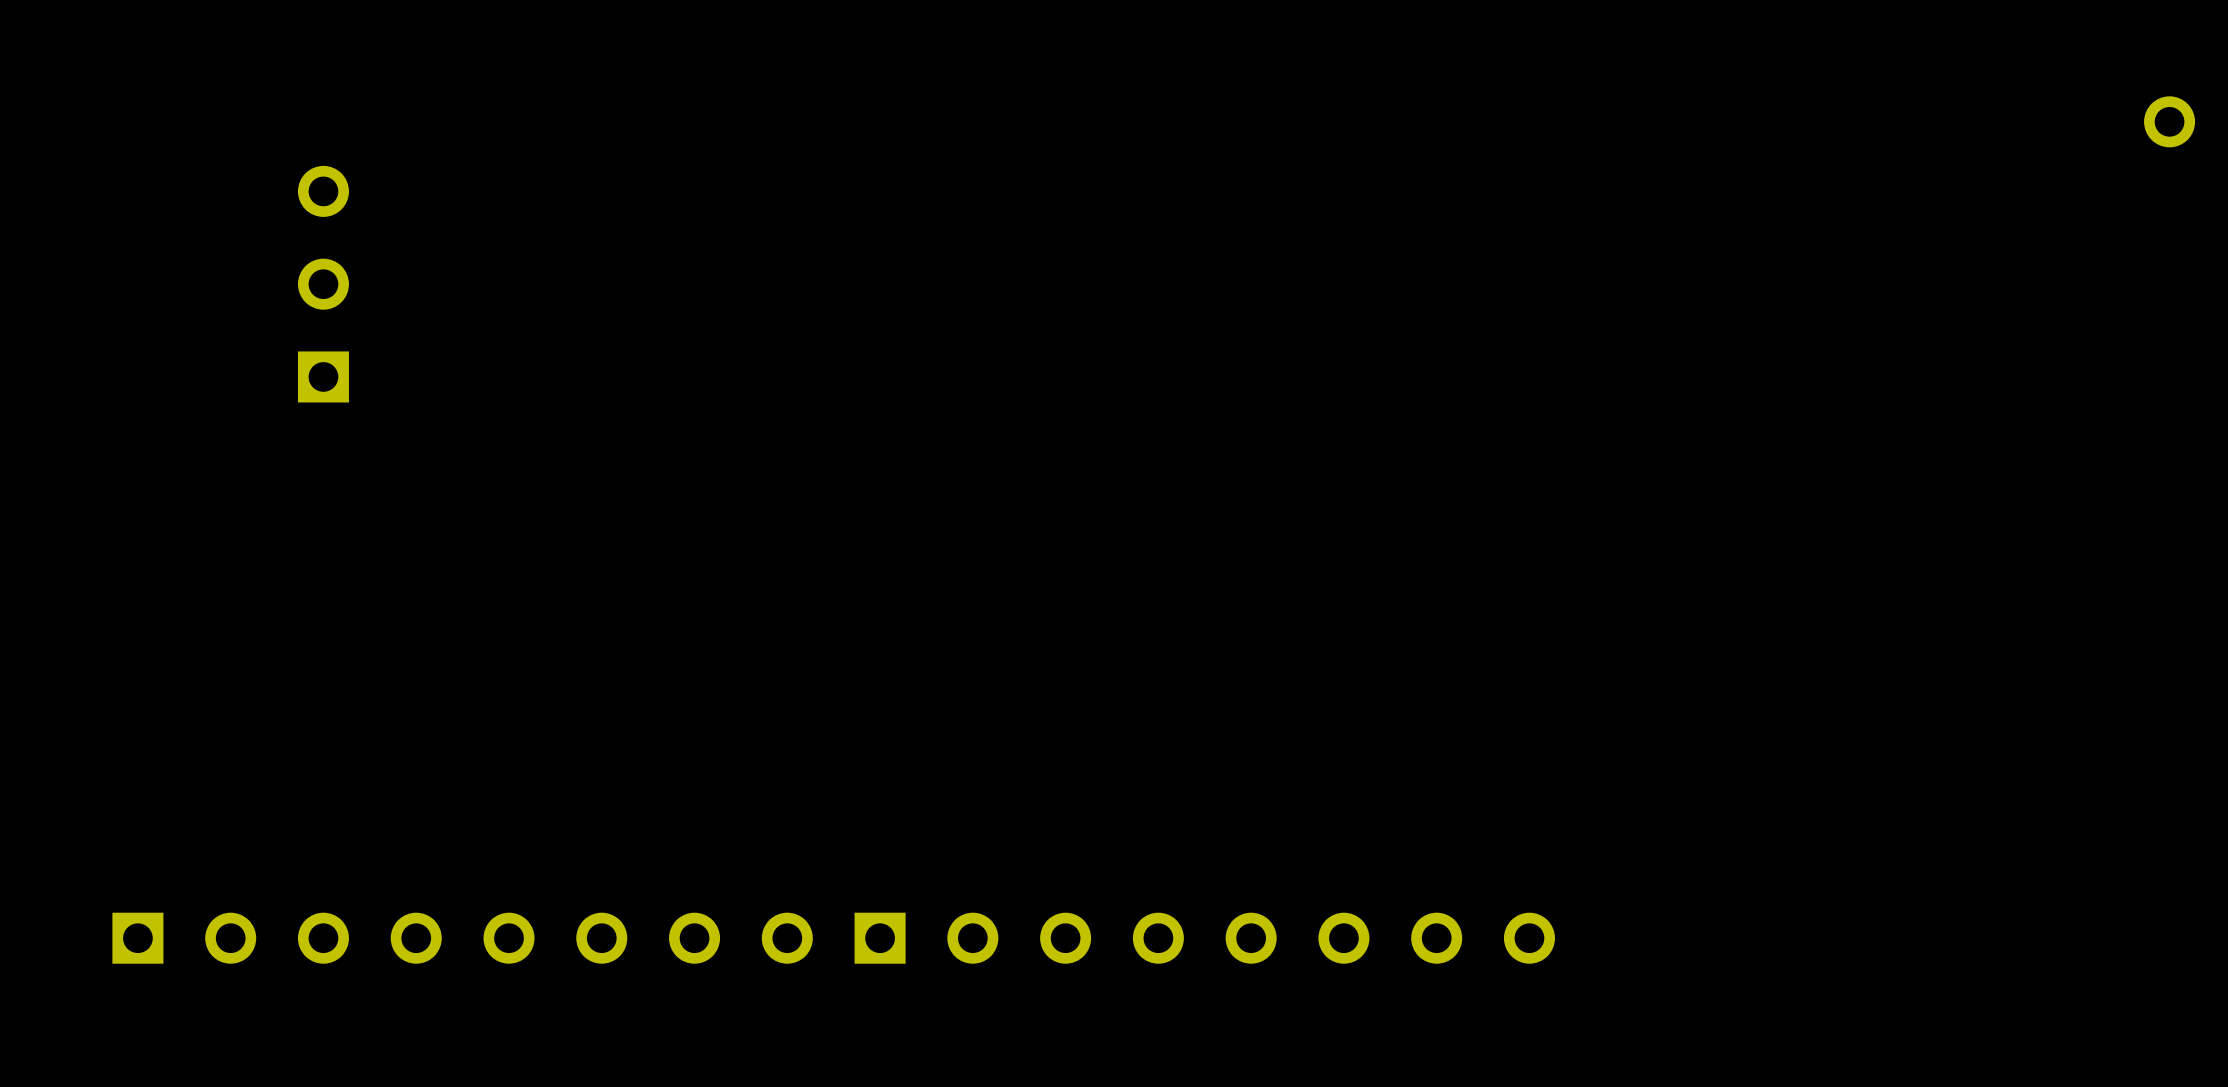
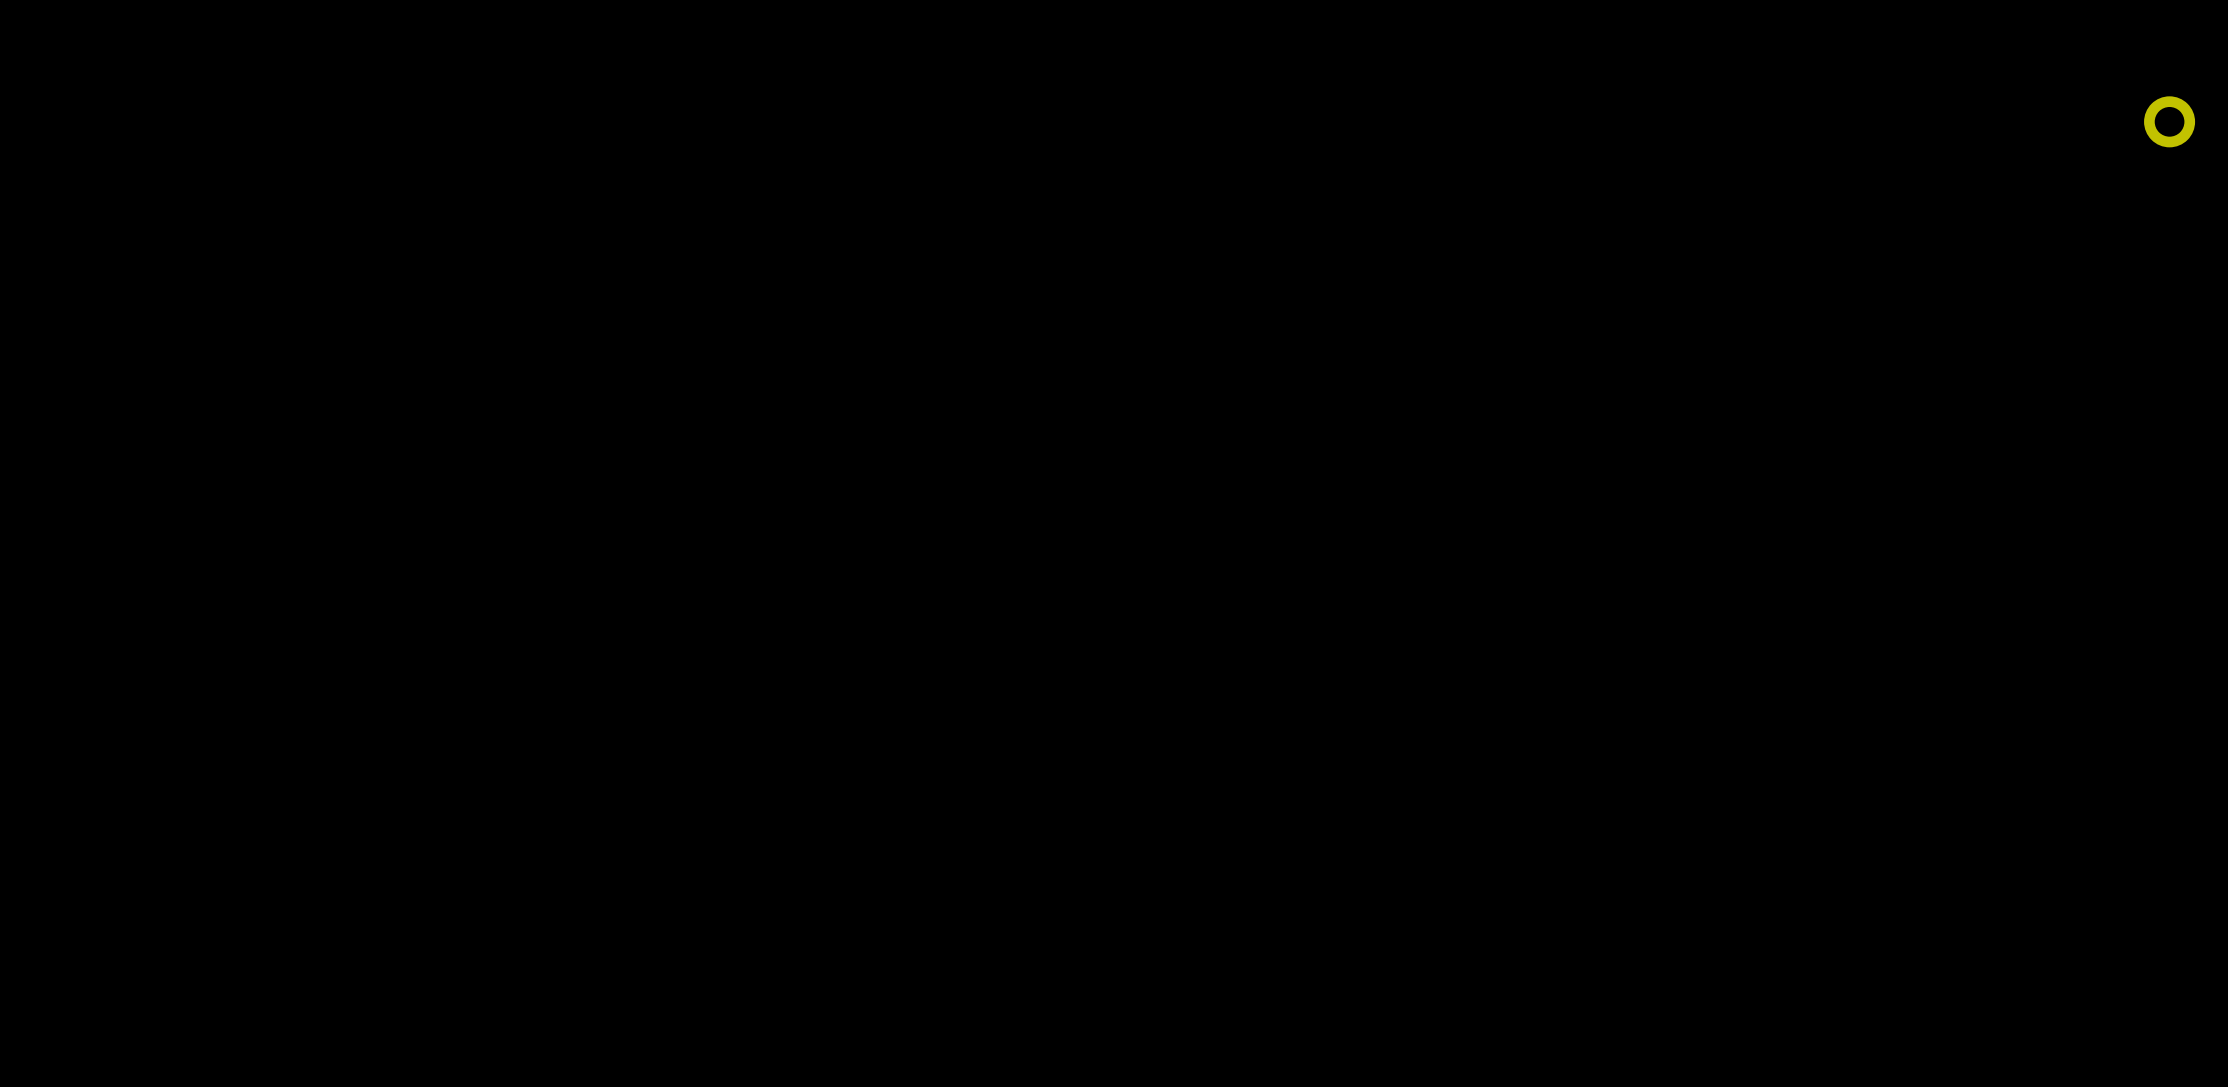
part: (323, 284) -> none
part: (462, 938) -> none
part: (1204, 938) -> none

